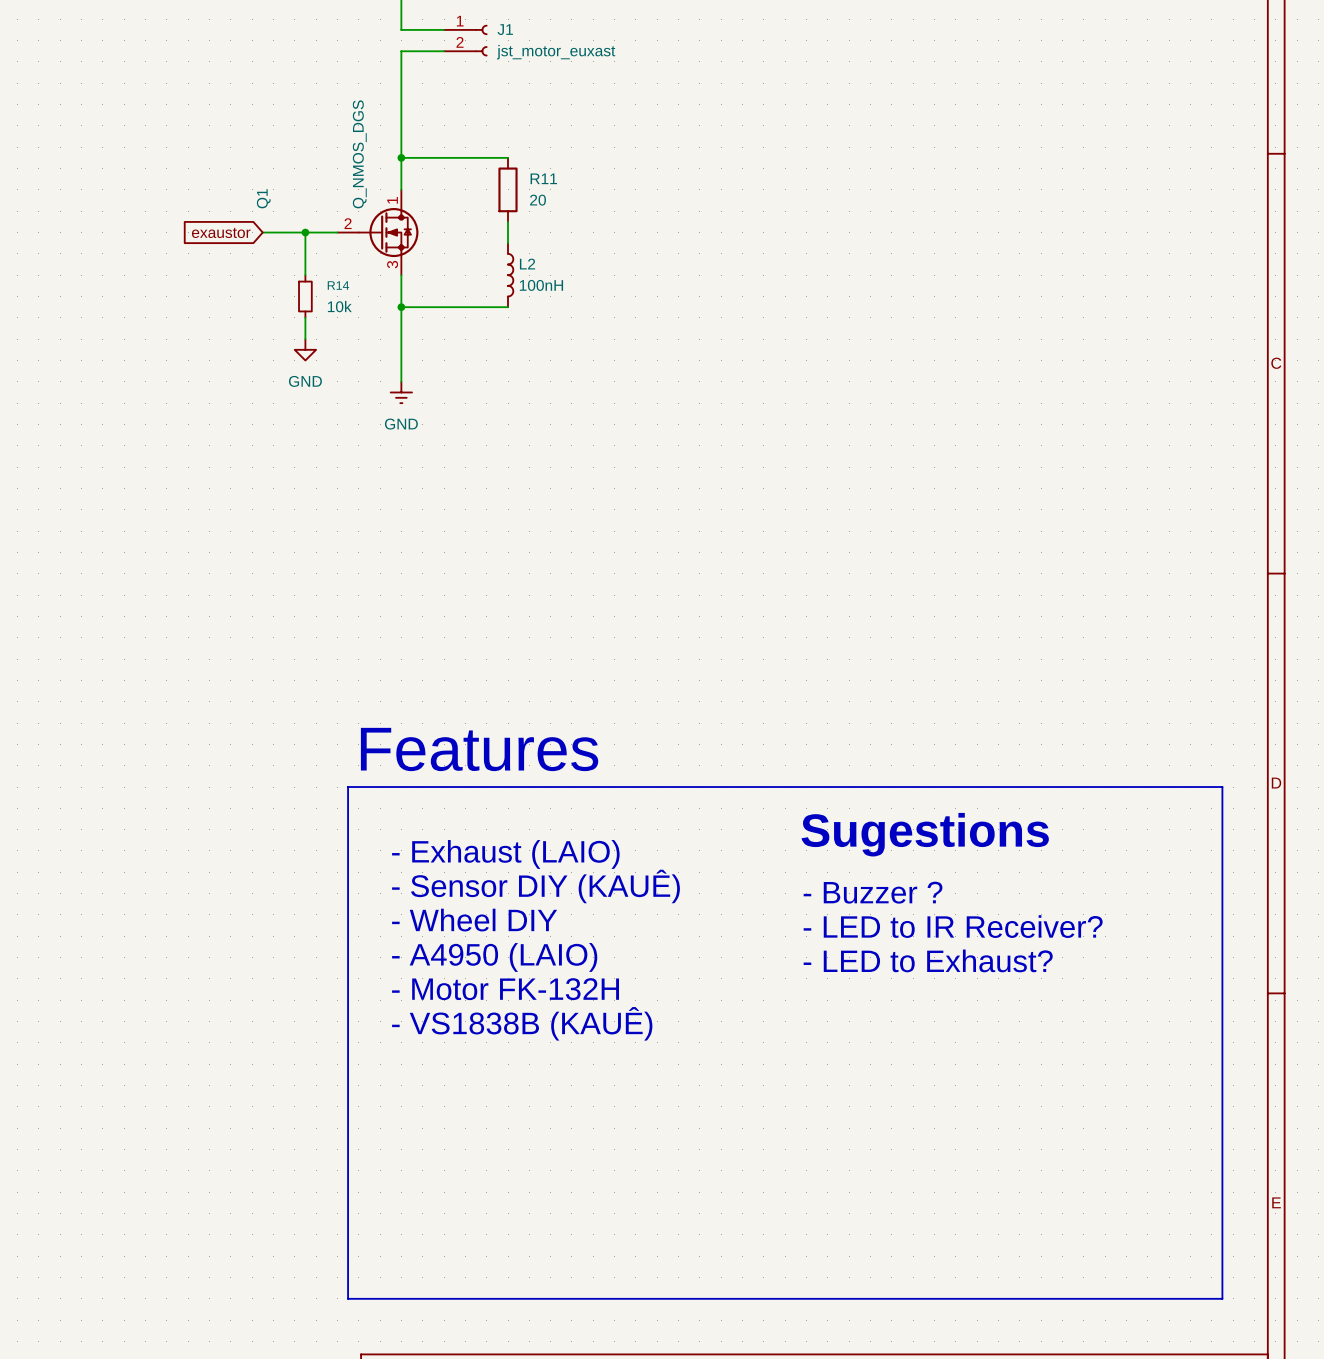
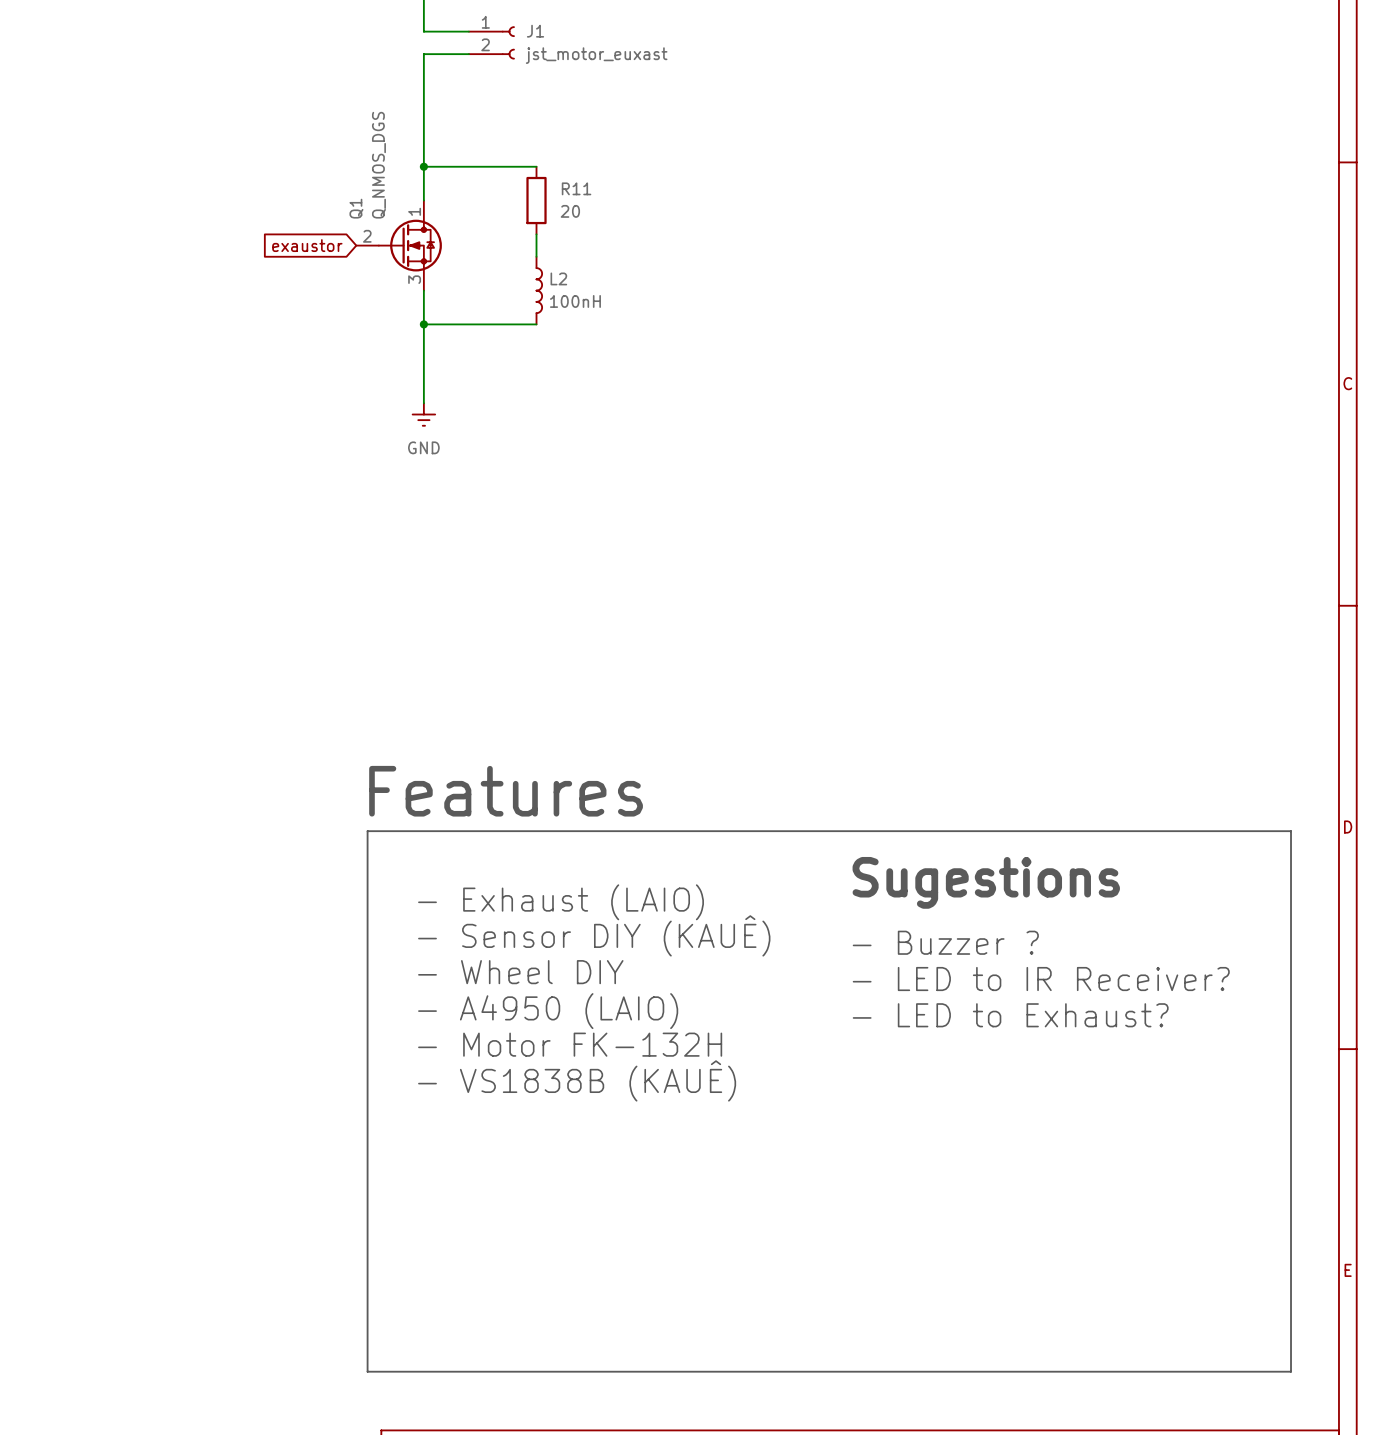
Q1 name position: Q1 (263, 198) -> Q1 (356, 208)
global label position: exaustor (221, 232) -> exaustor (307, 245)
wire: (262, 232) (337, 232) -> none
wire: (305, 232) (305, 275) -> none
junction: (305, 232) -> none
R14: 10k (305, 296) -> none
wire: (305, 317) (305, 339) -> none
power symbol: GND (305, 349) -> none

